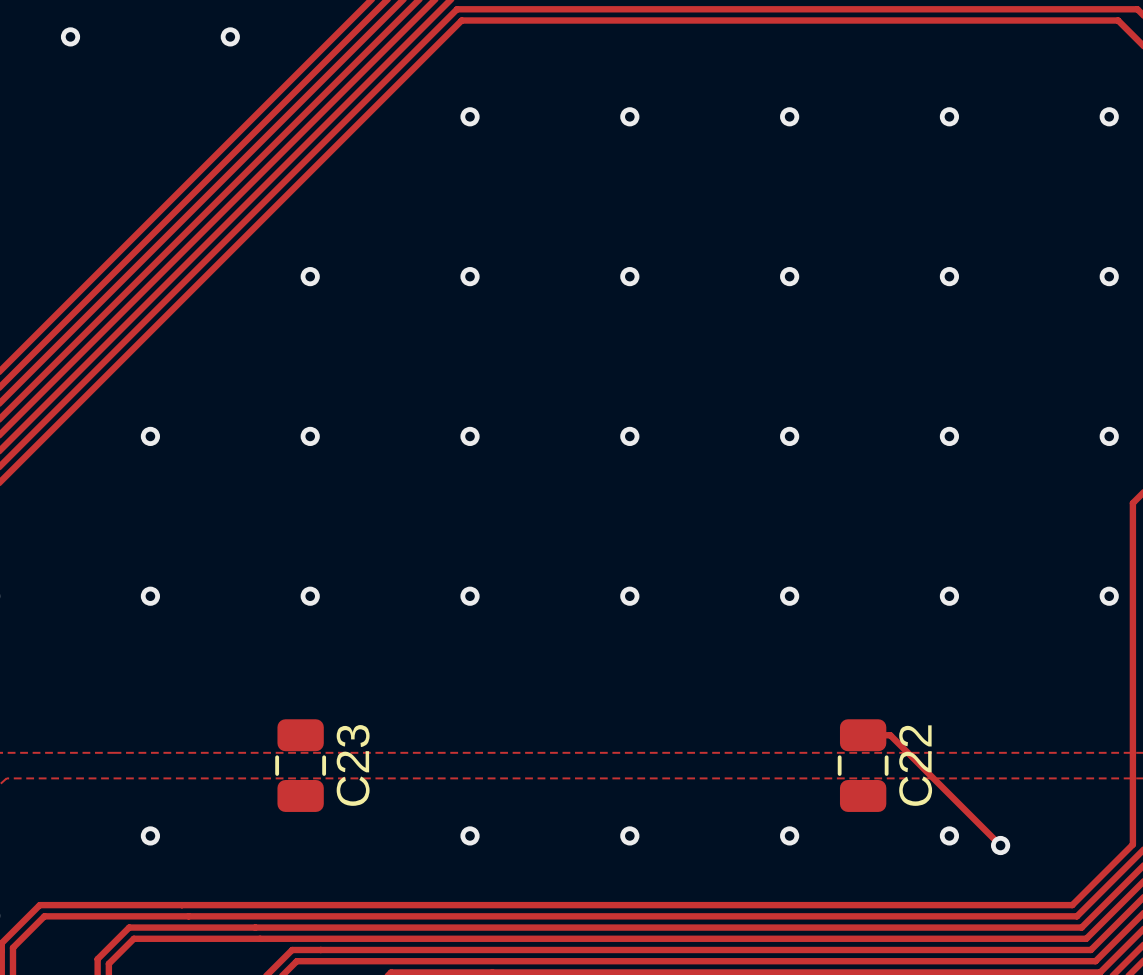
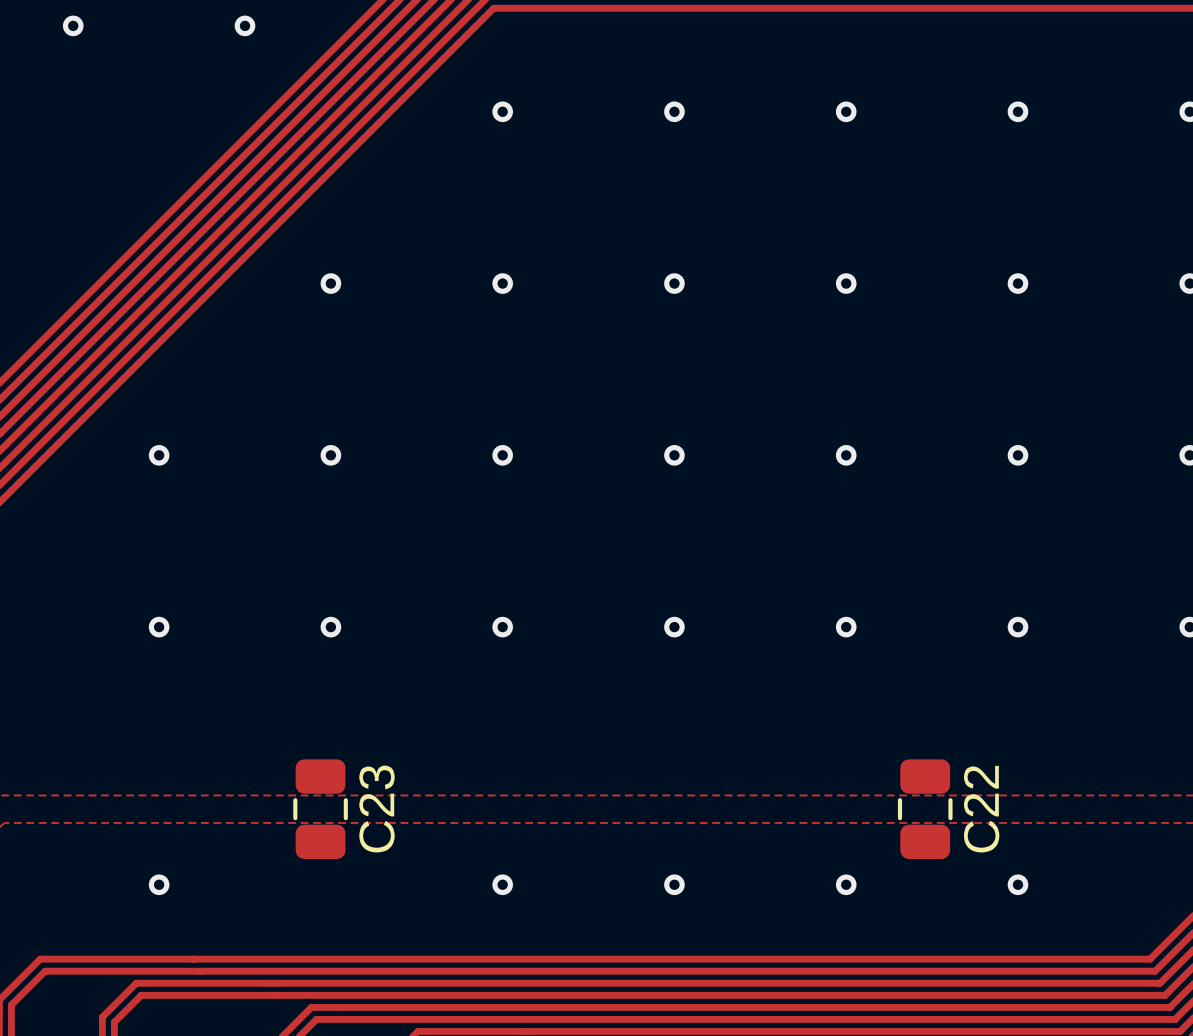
track: (863, 735) (890, 735) (1000, 845) -> none
via: (1000, 845) -> none

